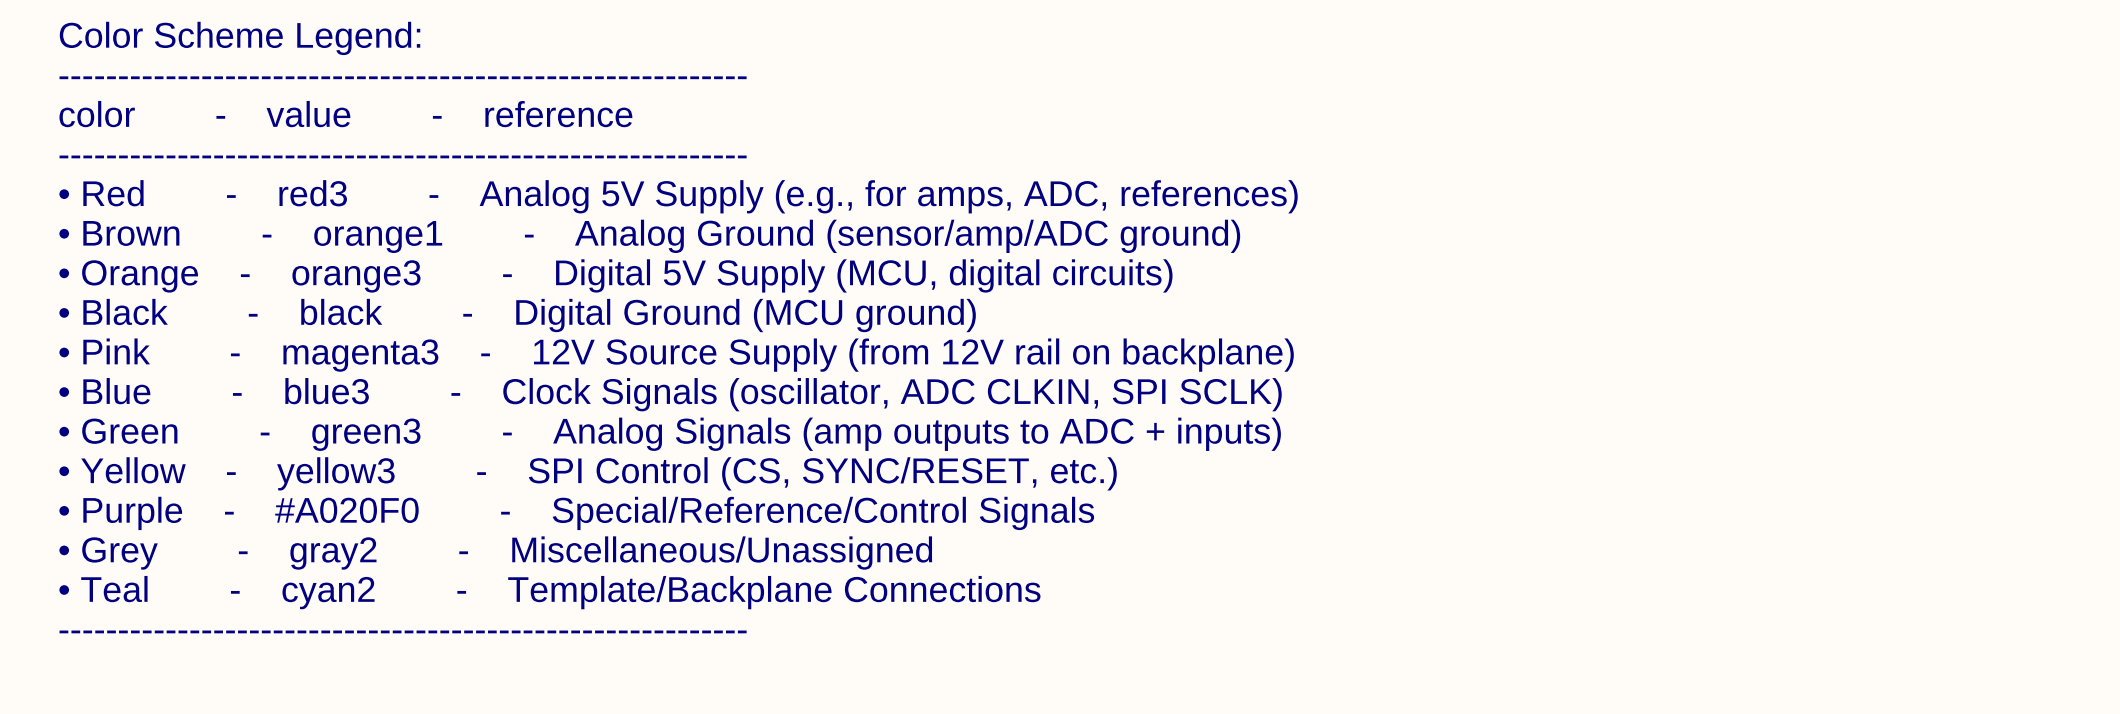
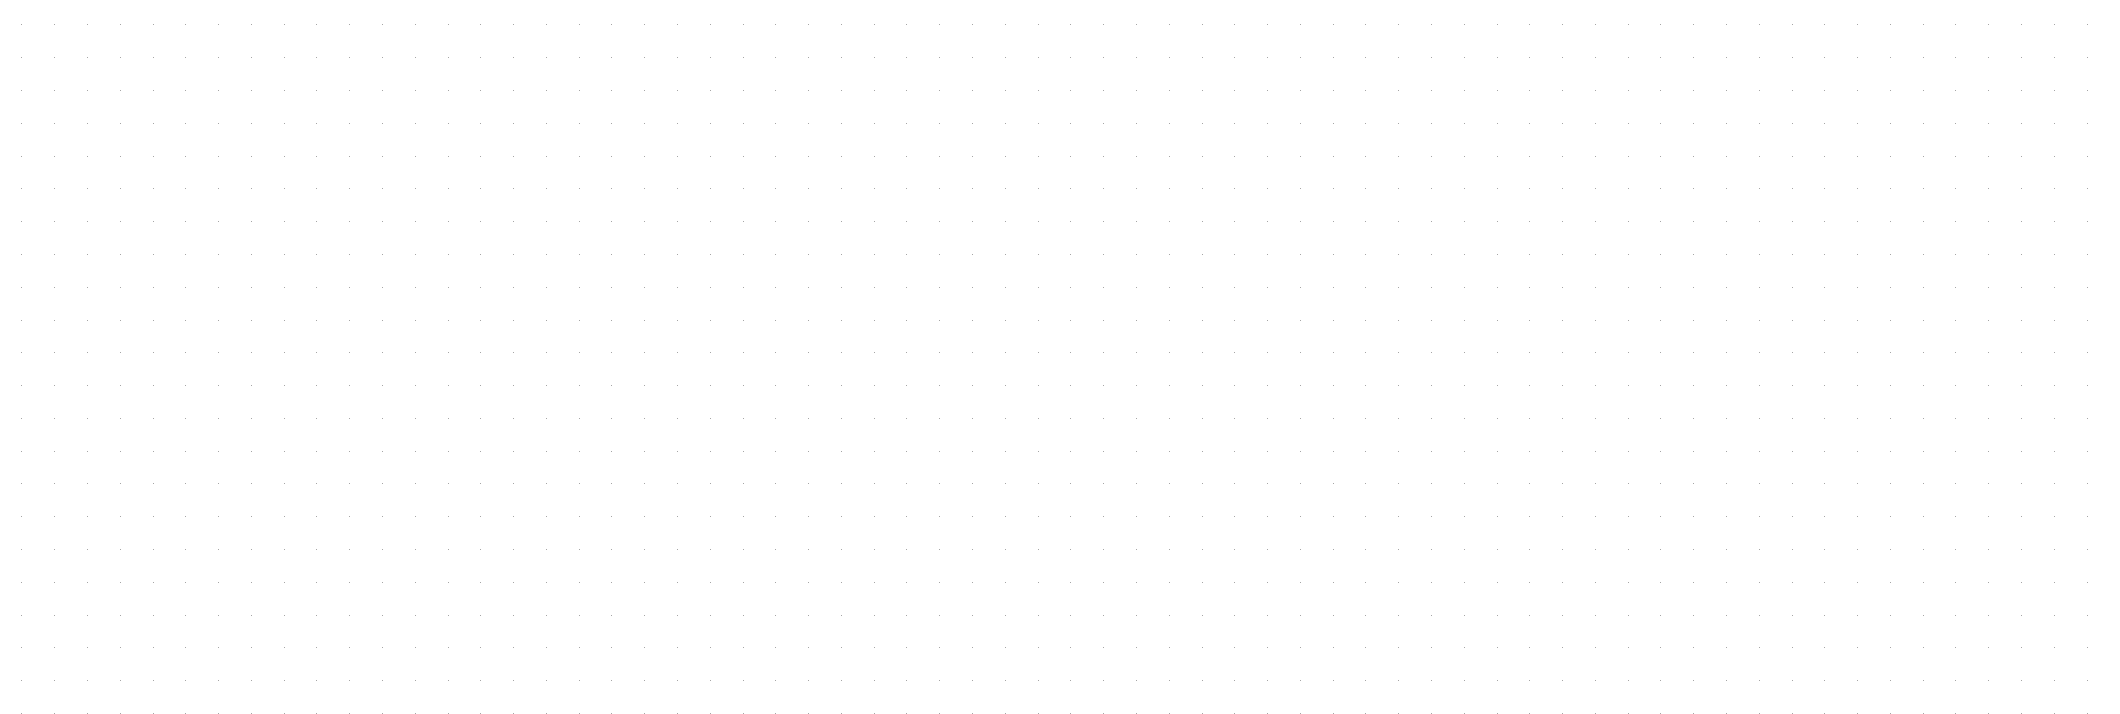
text: Color Scheme Legend: (240, 38) -> none
text: ---------------------------------------------------------- (403, 77) -> none
text: color - value - reference (345, 114) -> none
text: ---------------------------------------------------------- (403, 156) -> none
text: • Red - red3 - Analog 5V Supply (e.g., for amps, ADC, references) (678, 196) -> none
text: • Brown - orange1 - Analog Ground (sensor/amp/ADC ground) (649, 236) -> none
text: • Orange - orange3 - Digital 5V Supply (MCU, digital circuits) (615, 275) -> none
text: • Black - black - Digital Ground (MCU ground) (517, 315) -> none
text: • Pink - magenta3 - 12V Source Supply (from 12V rail on backplane) (676, 355) -> none
text: • Blue - blue3 - Clock Signals (oscillator, ADC CLKIN, SPI SCLK) (670, 394) -> none
text: • Green - green3 - Analog Signals (amp outputs to ADC + inputs) (670, 434) -> none
text: • Yellow - yellow3 - SPI Control (CS, SYNC/RESET, etc.) (588, 473) -> none
text: • Purple - #A020F0 - Special/Reference/Control Signals (576, 513) -> none
text: • Grey - gray2 - Miscellaneous/Unassigned (495, 553) -> none
text: • Teal - cyan2 - Template/Backplane Connections (549, 592) -> none
text: ---------------------------------------------------------- (403, 631) -> none

